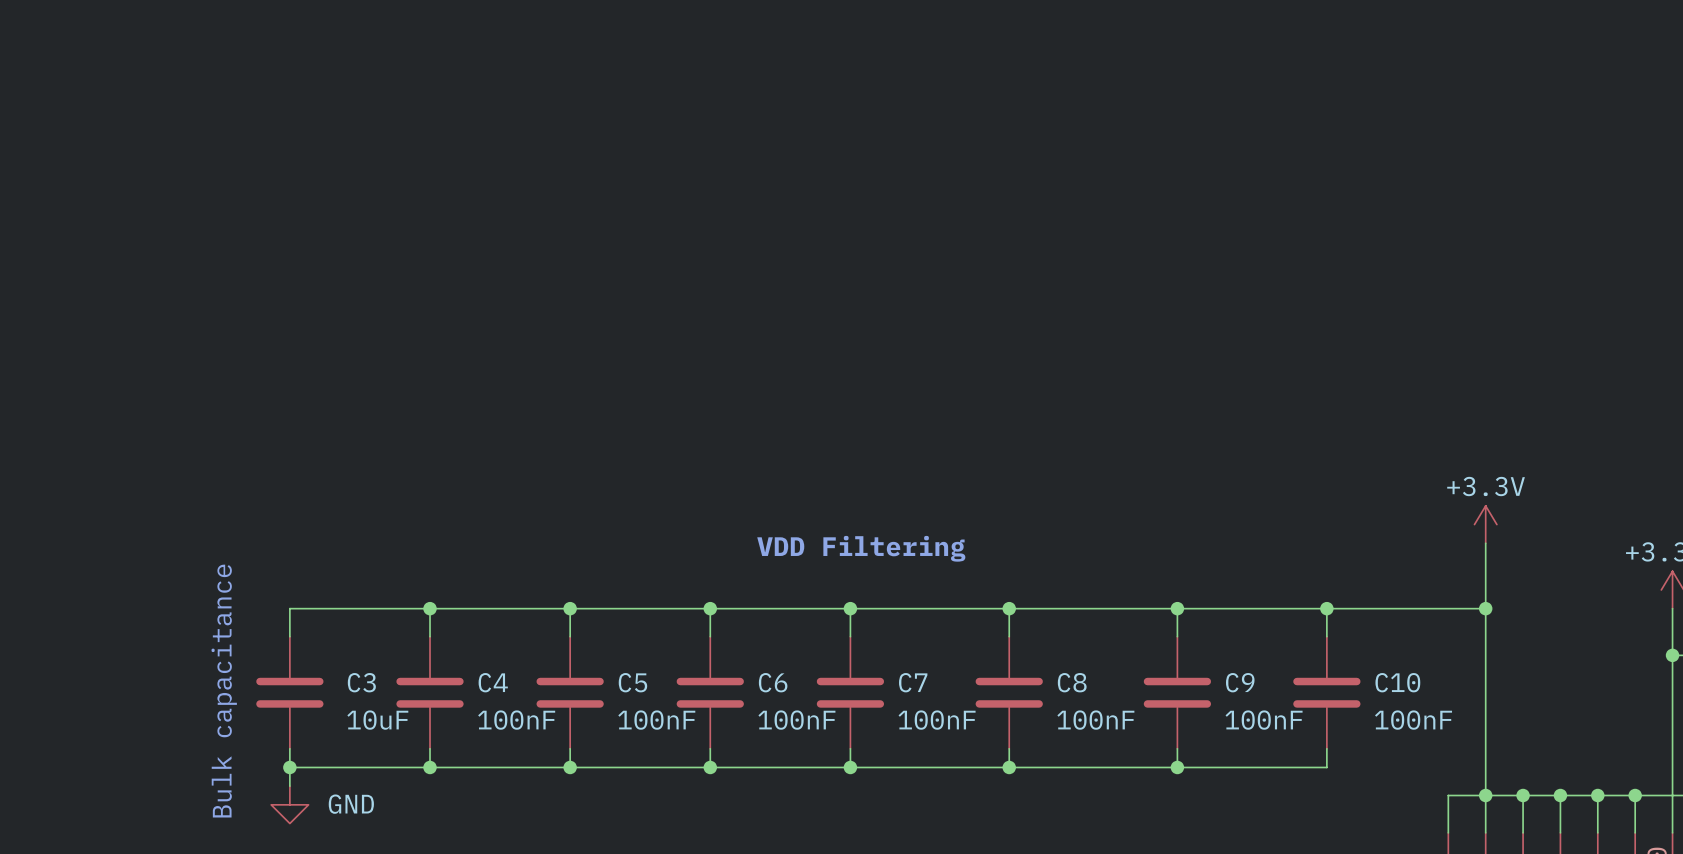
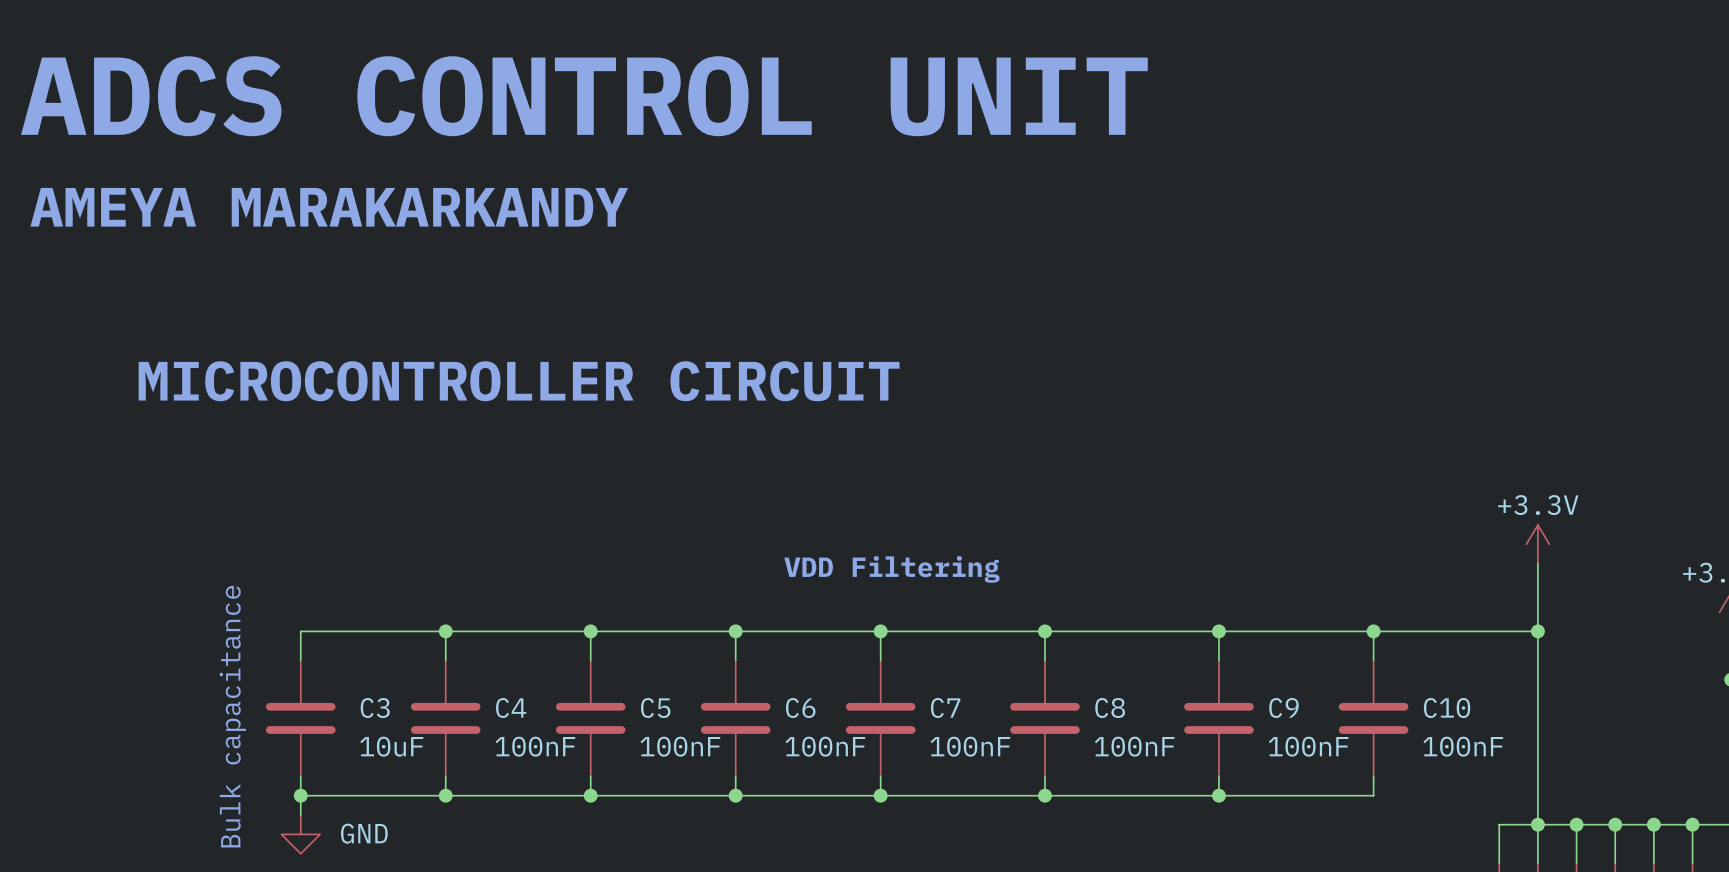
text: none -> ADCS CONTROL UNIT (584, 96)
text: none -> AMEYA MARAKARKANDY (329, 207)
text: none -> MICROCONTROLLER CIRCUIT (519, 381)

